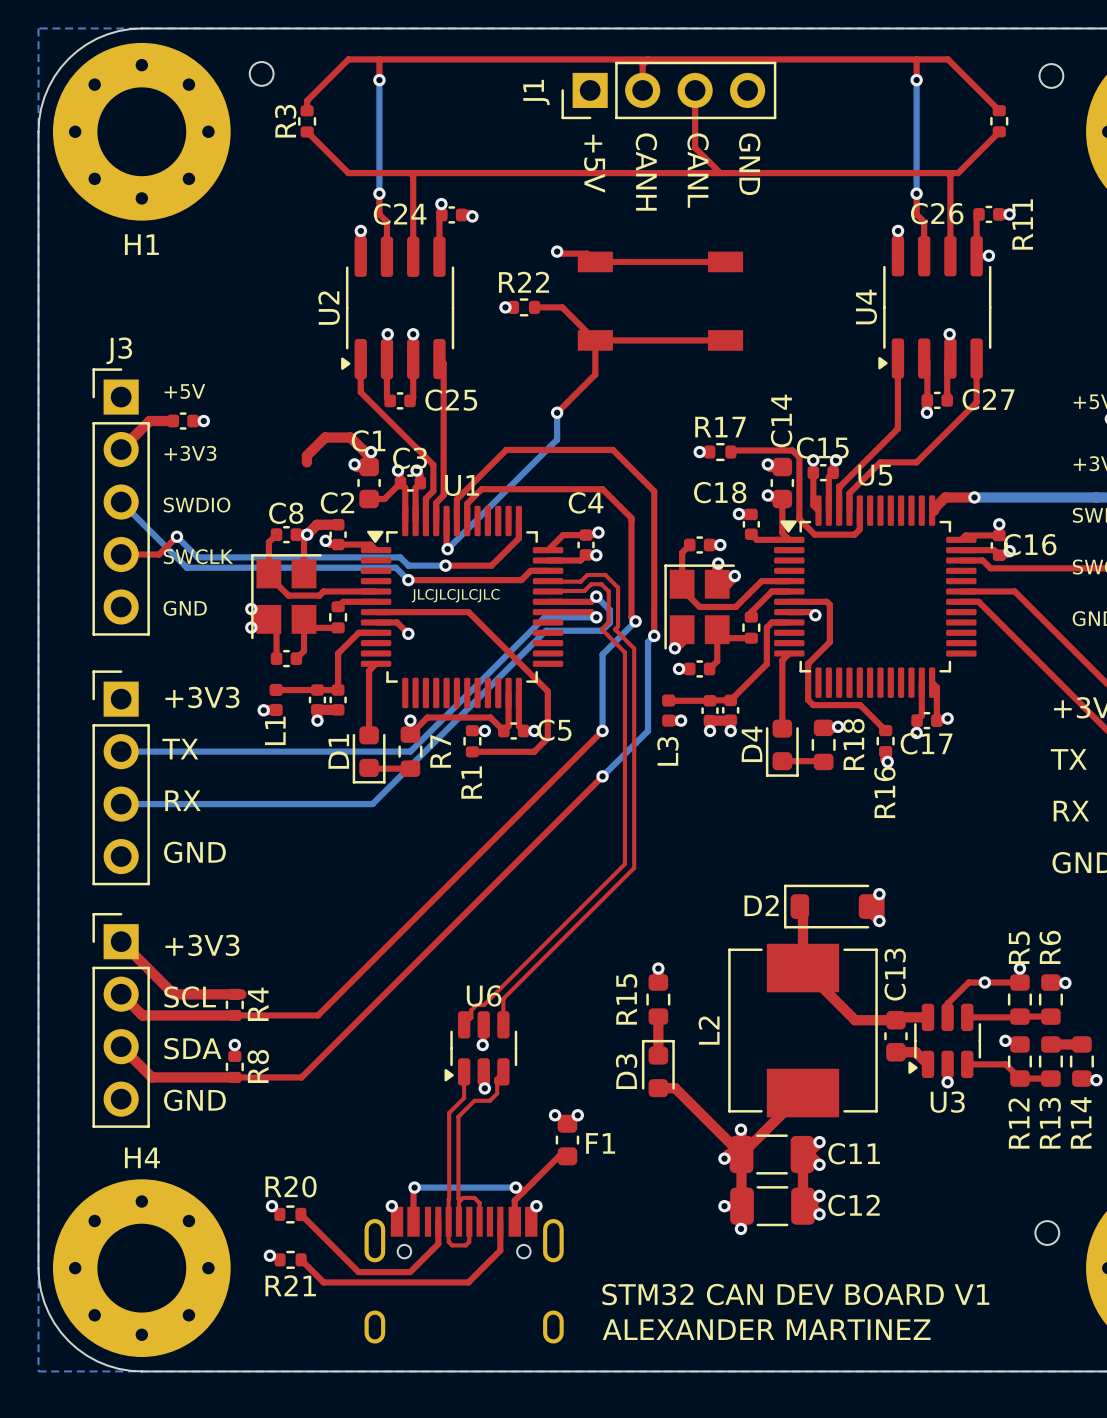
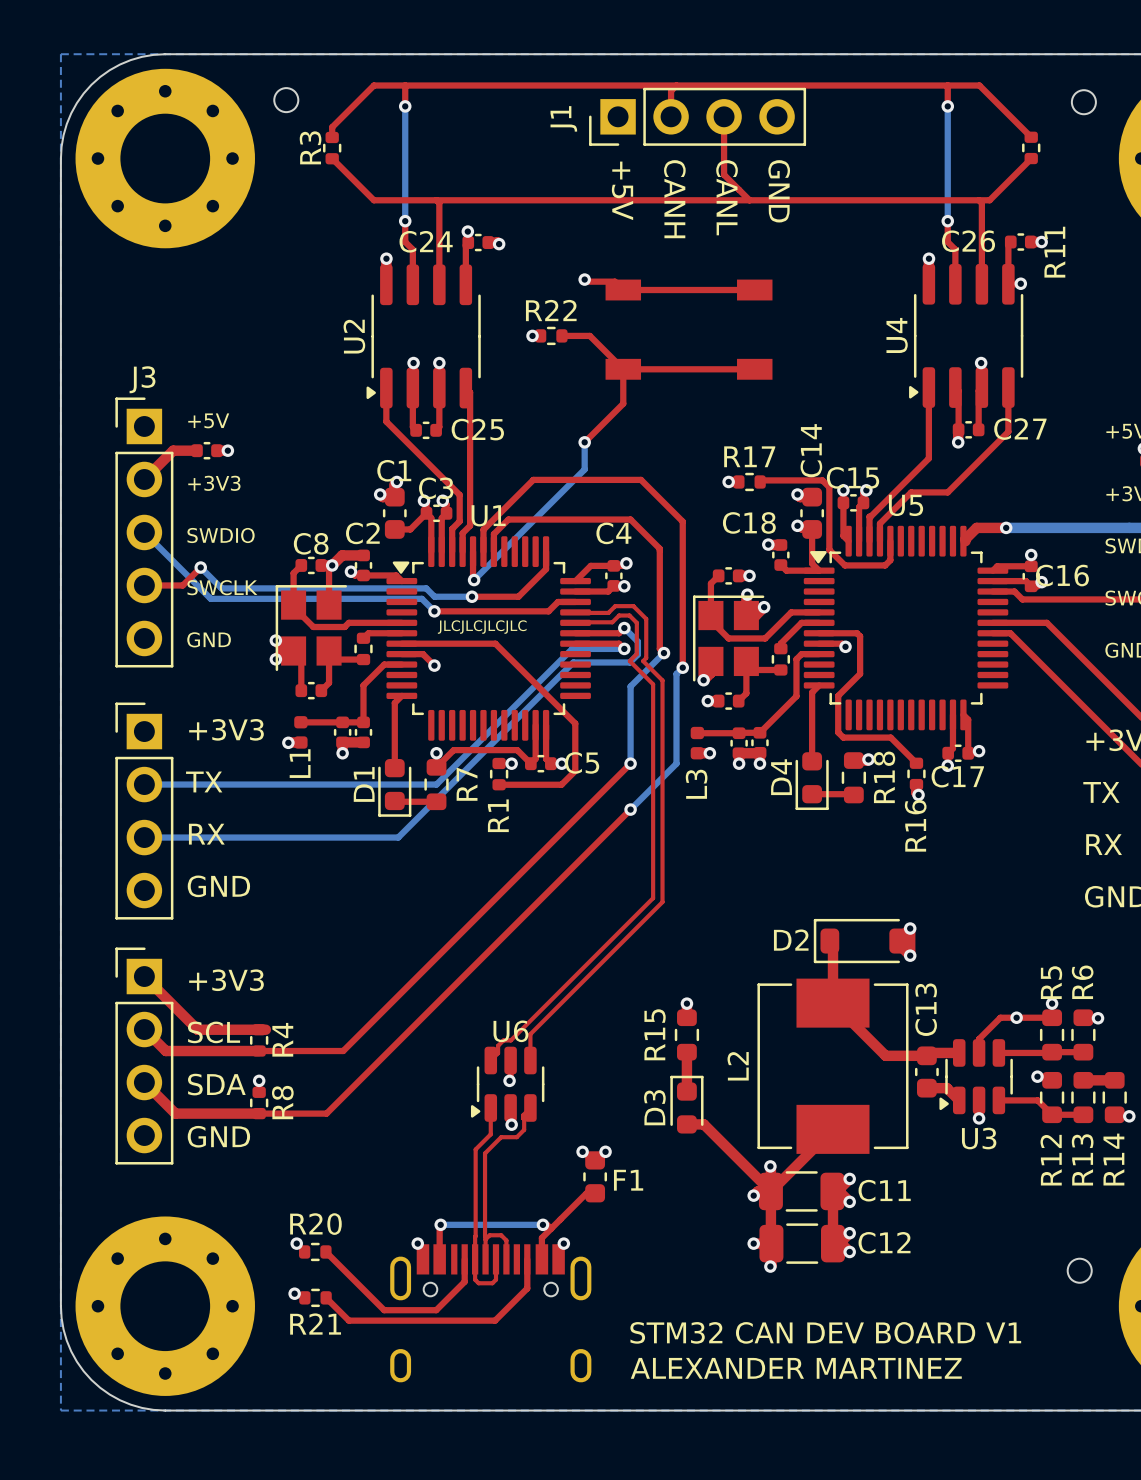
H1 name: H1 (141, 244) -> none
top track: (369, 456) (350, 437) (325, 437) (306, 455) (306, 462) -> none
H4 name: H4 (142, 1157) -> none

